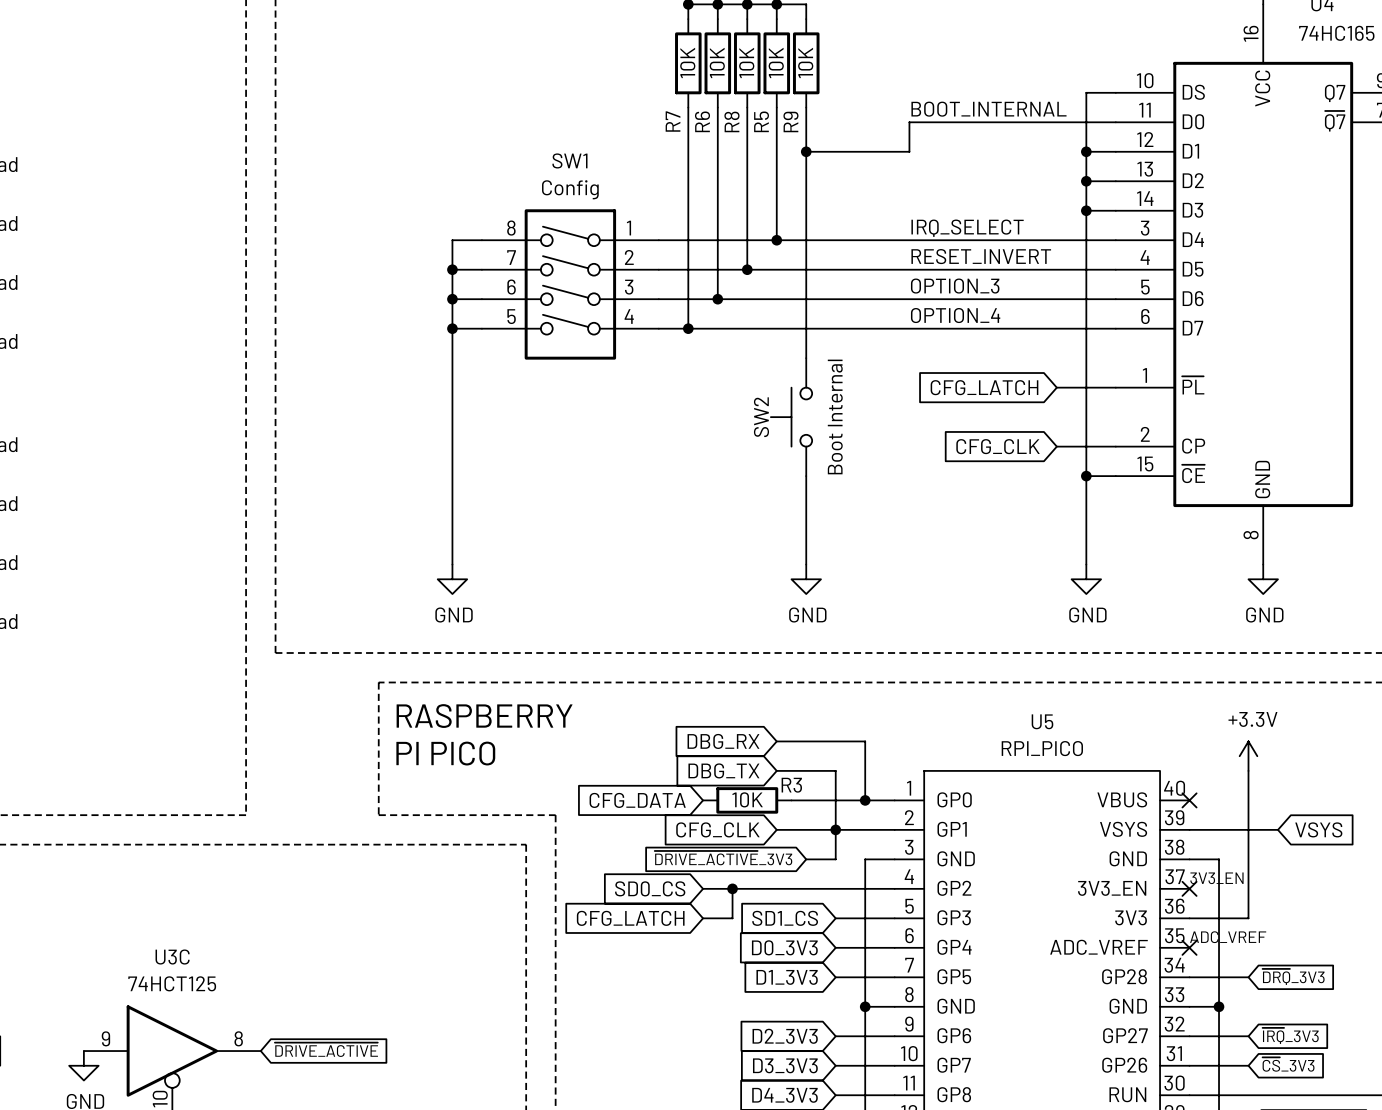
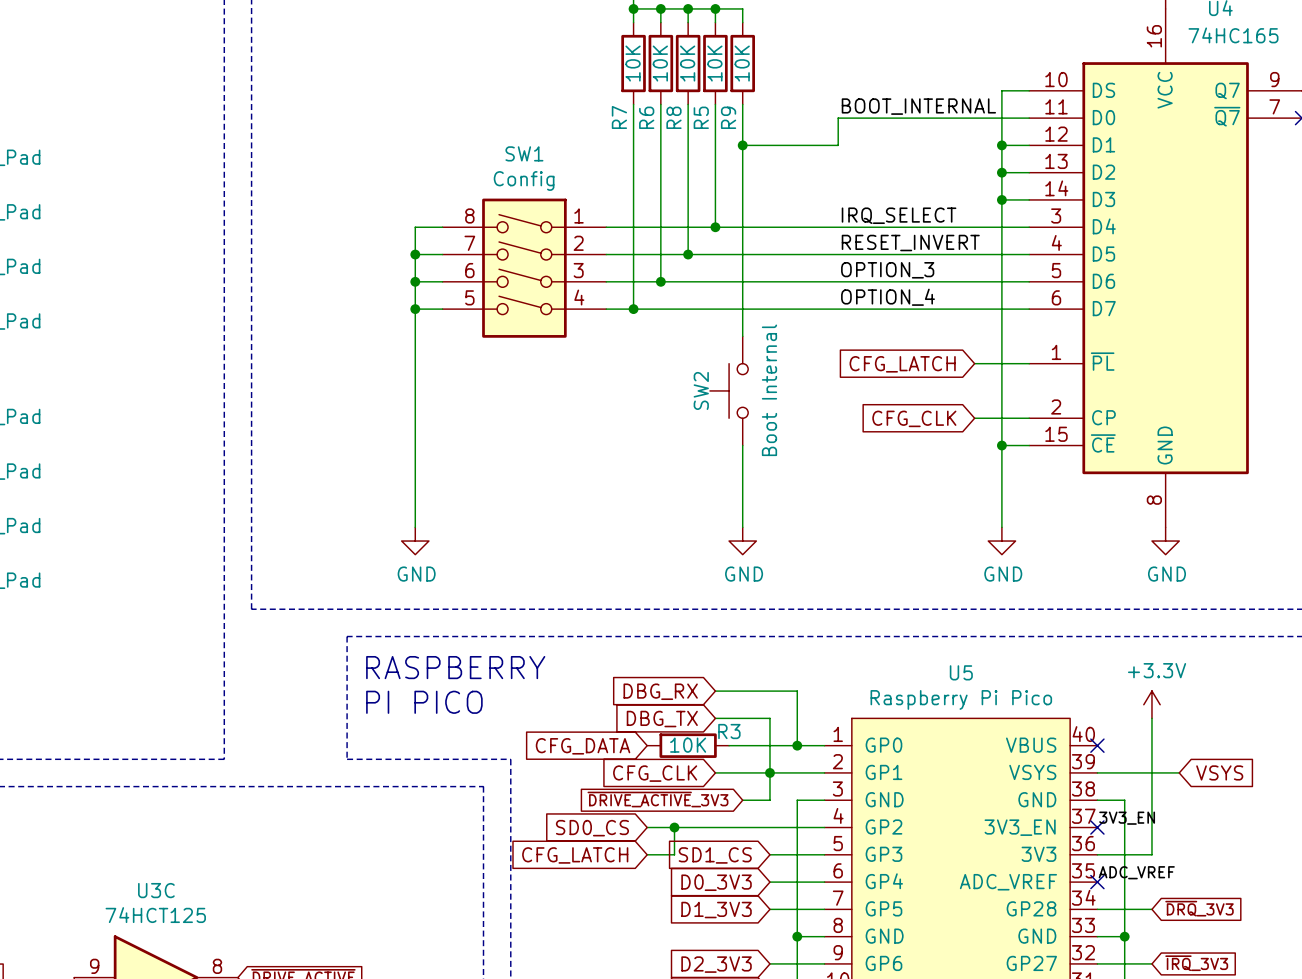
U5 value: RPI_PICO (1042, 748) -> Raspberry Pi Pico (961, 699)

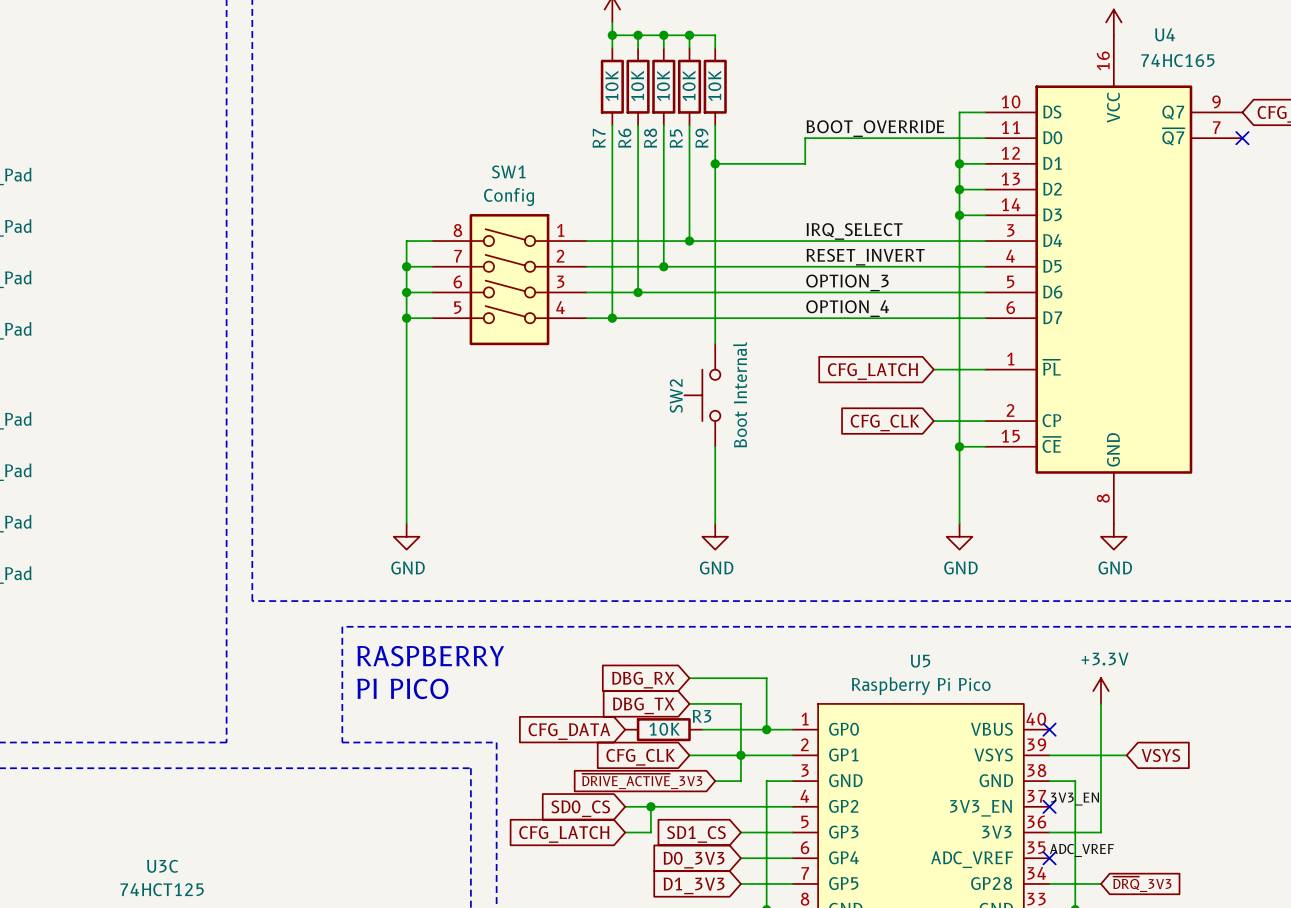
label: BOOT_INTERNAL (918, 106) -> BOOT_OVERRIDE (875, 128)

